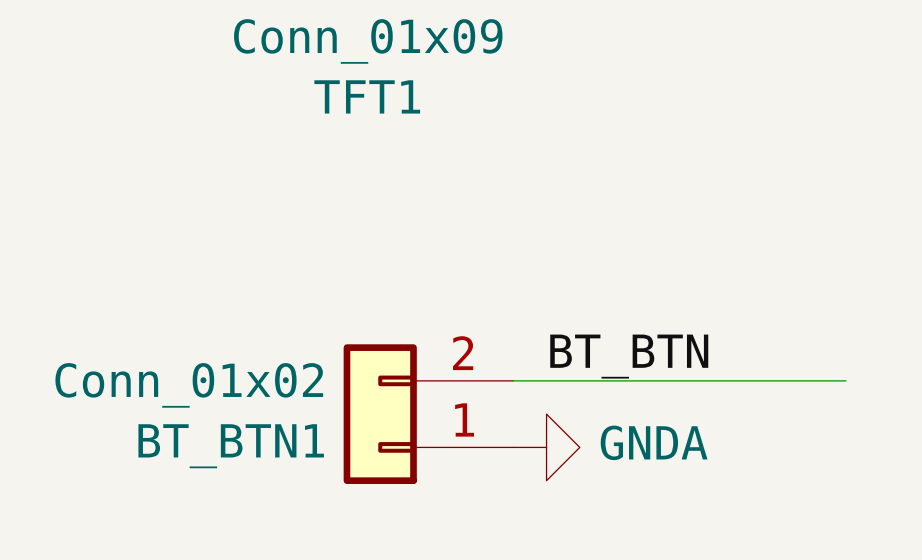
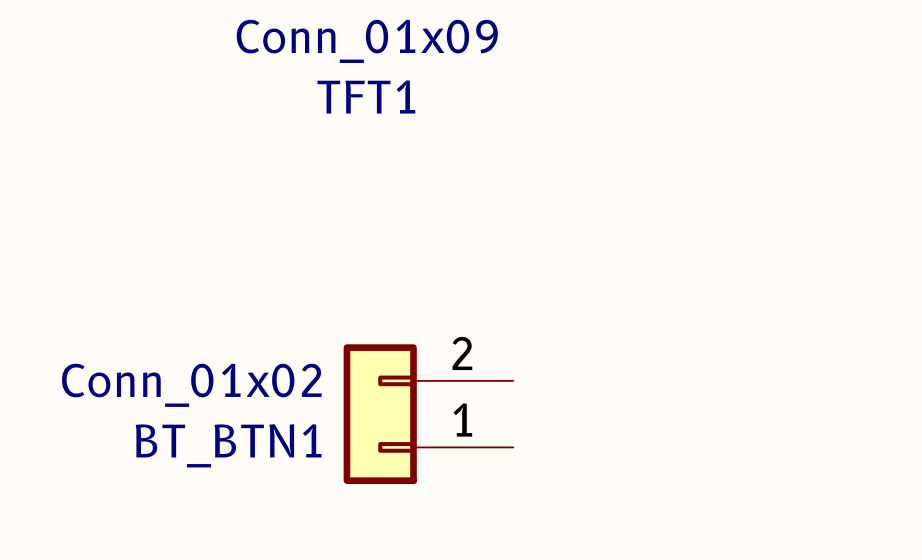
label: BT_BTN (629, 356) -> none
wire: (513, 380) (845, 380) -> none
power symbol: GNDA (546, 447) -> none

